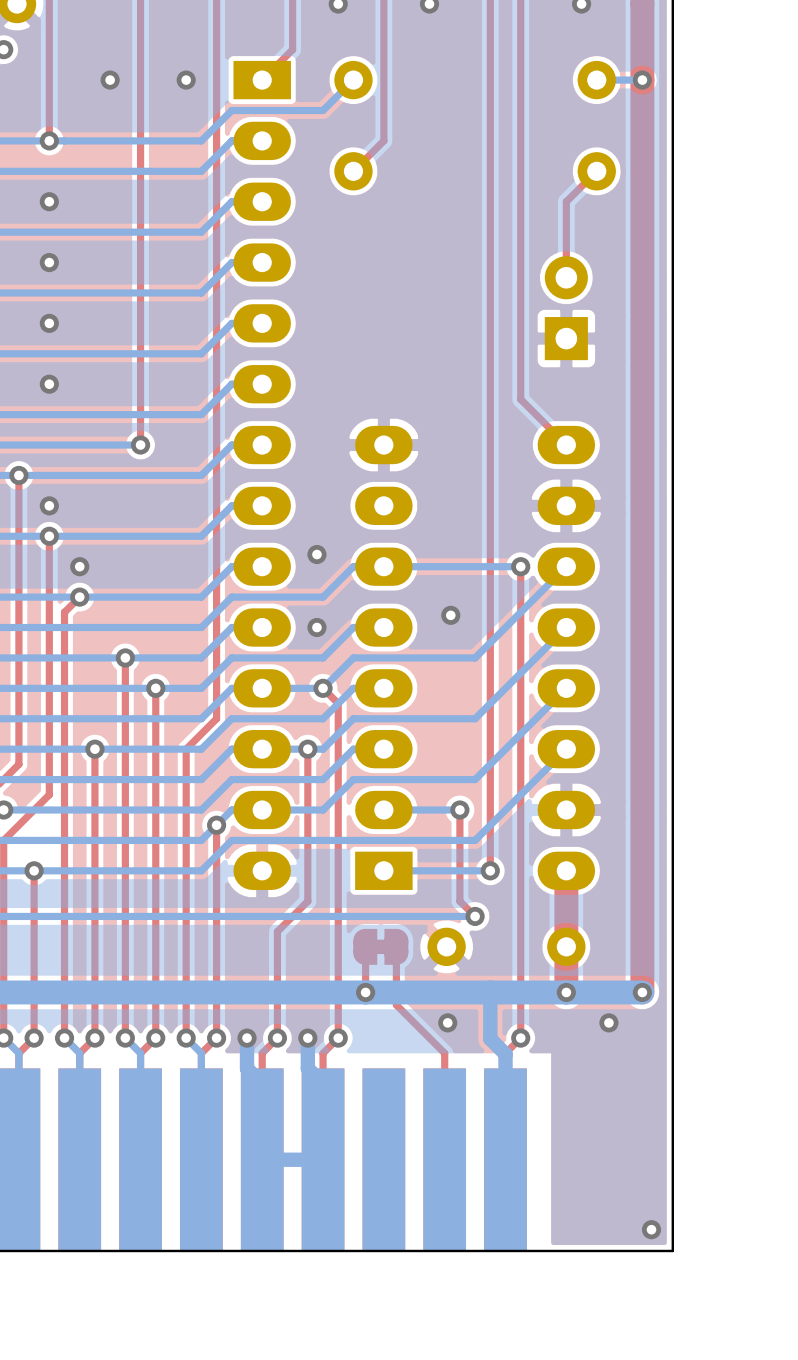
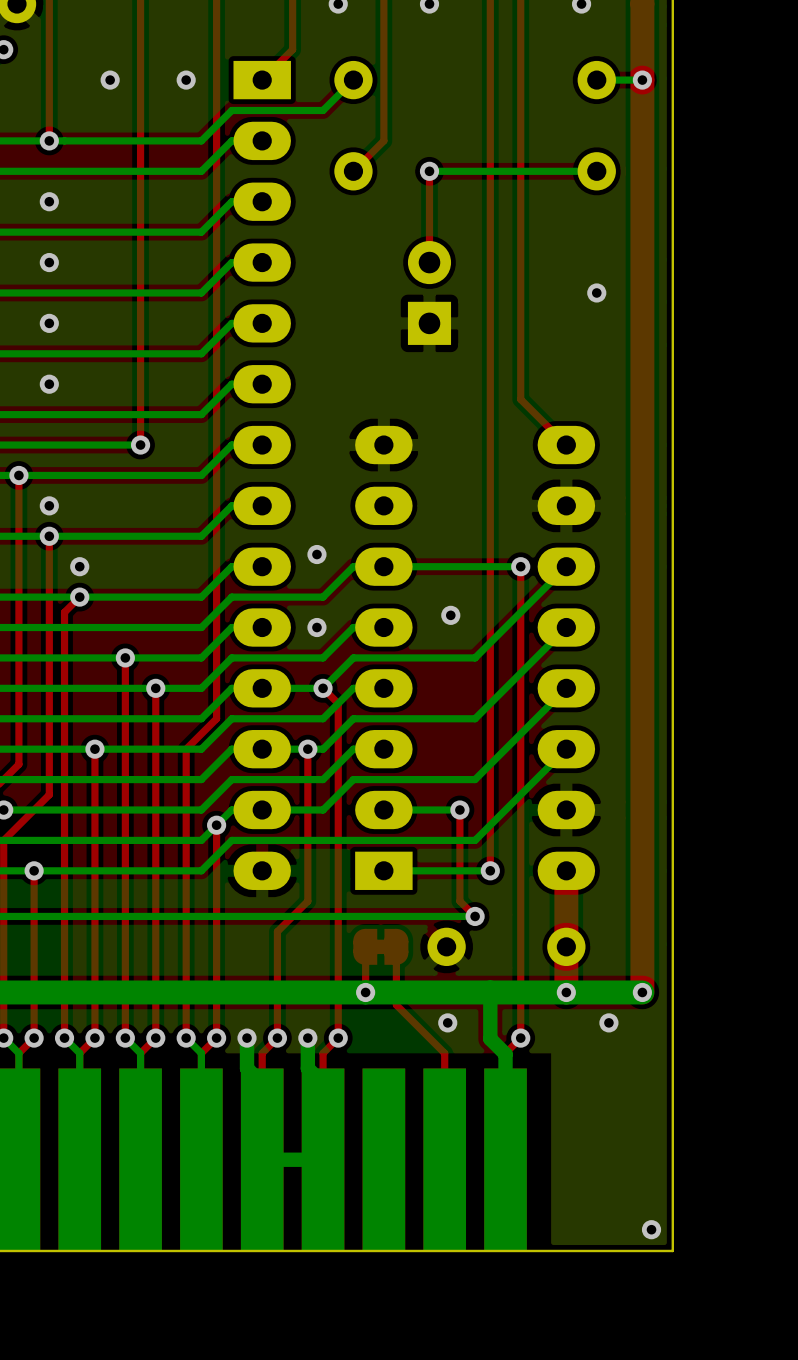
top track: none -> (429, 171) (429, 262)
via: none -> (429, 171)
top track: (596, 171) (566, 201) (566, 277) -> none
bottom track: none -> (596, 171) (429, 171)
via: none -> (596, 292)
part position: (566, 308) -> (429, 292)

